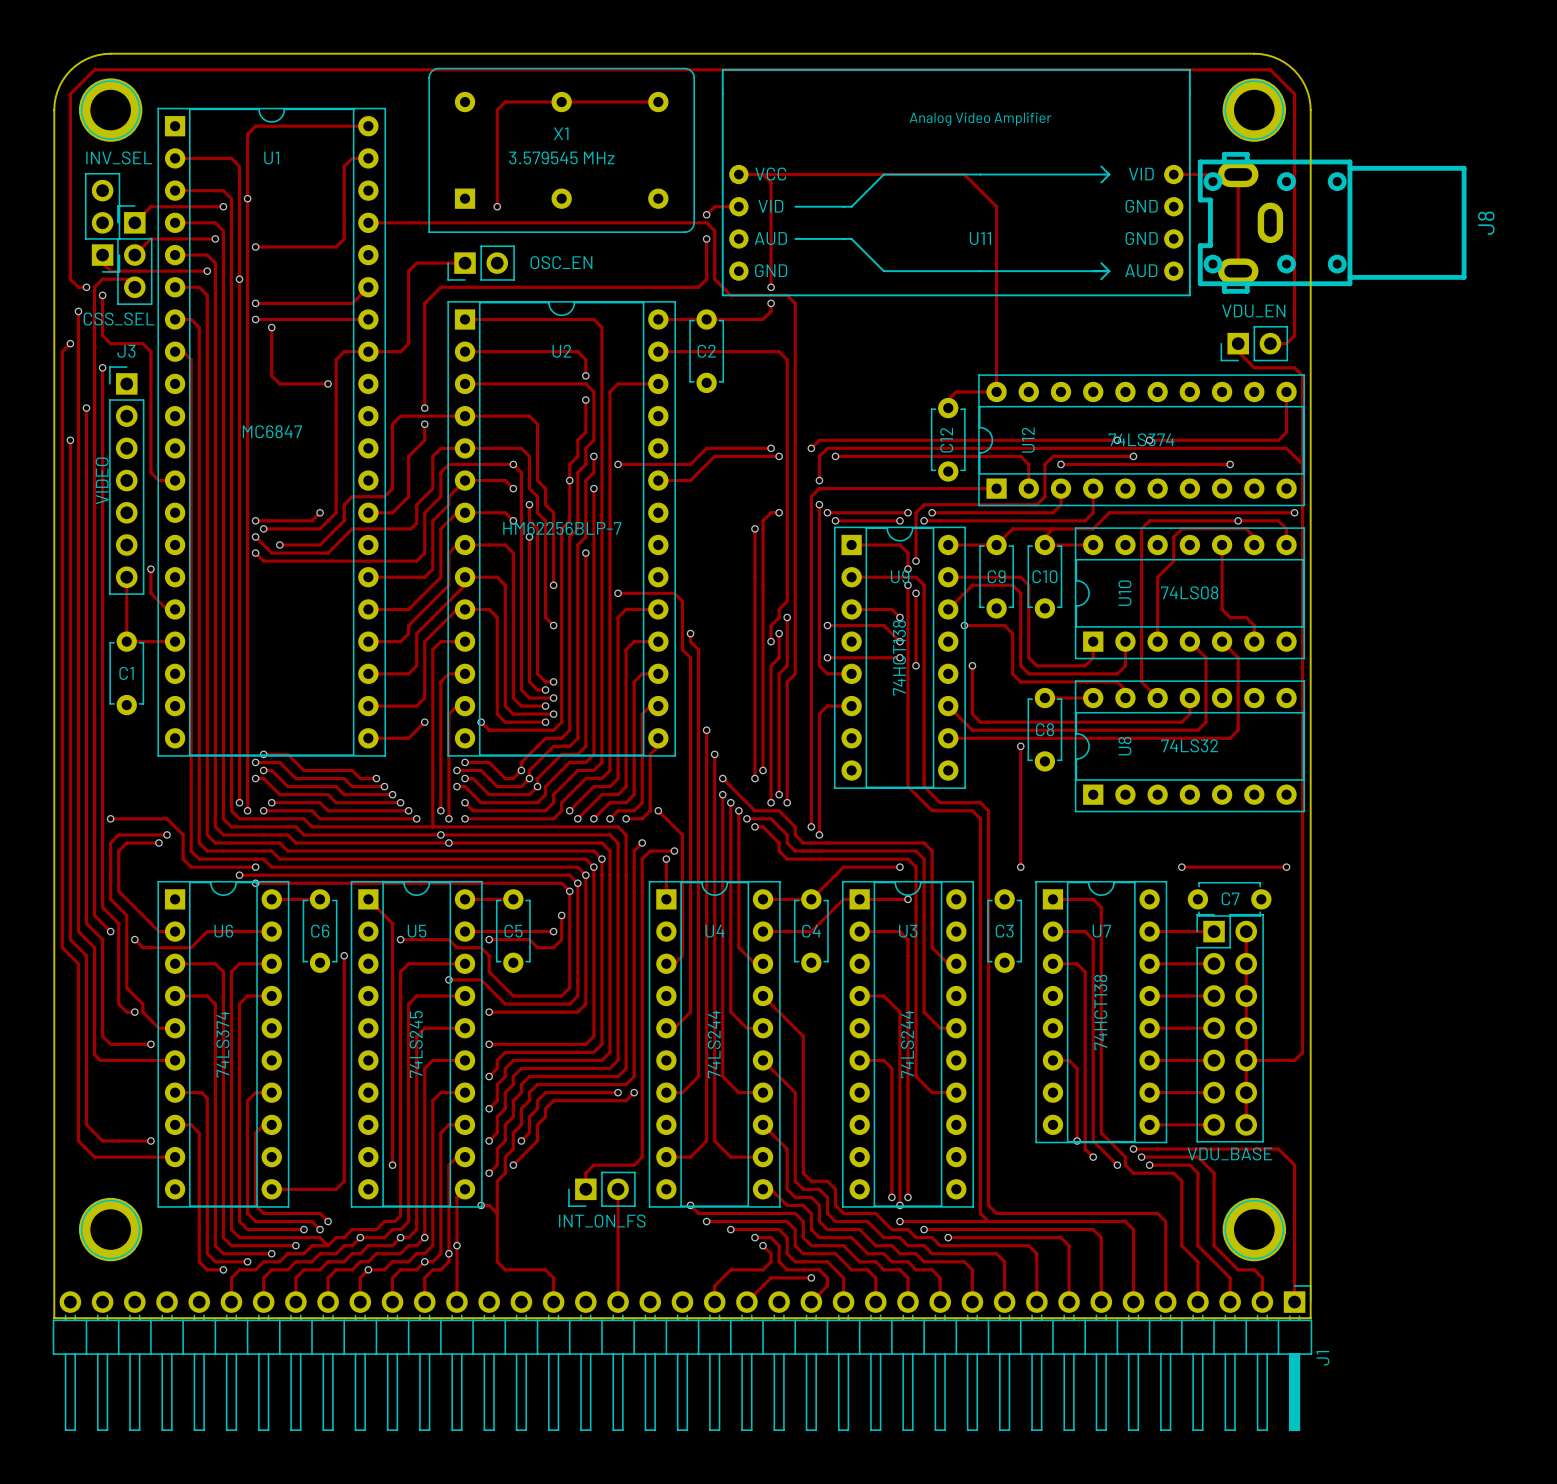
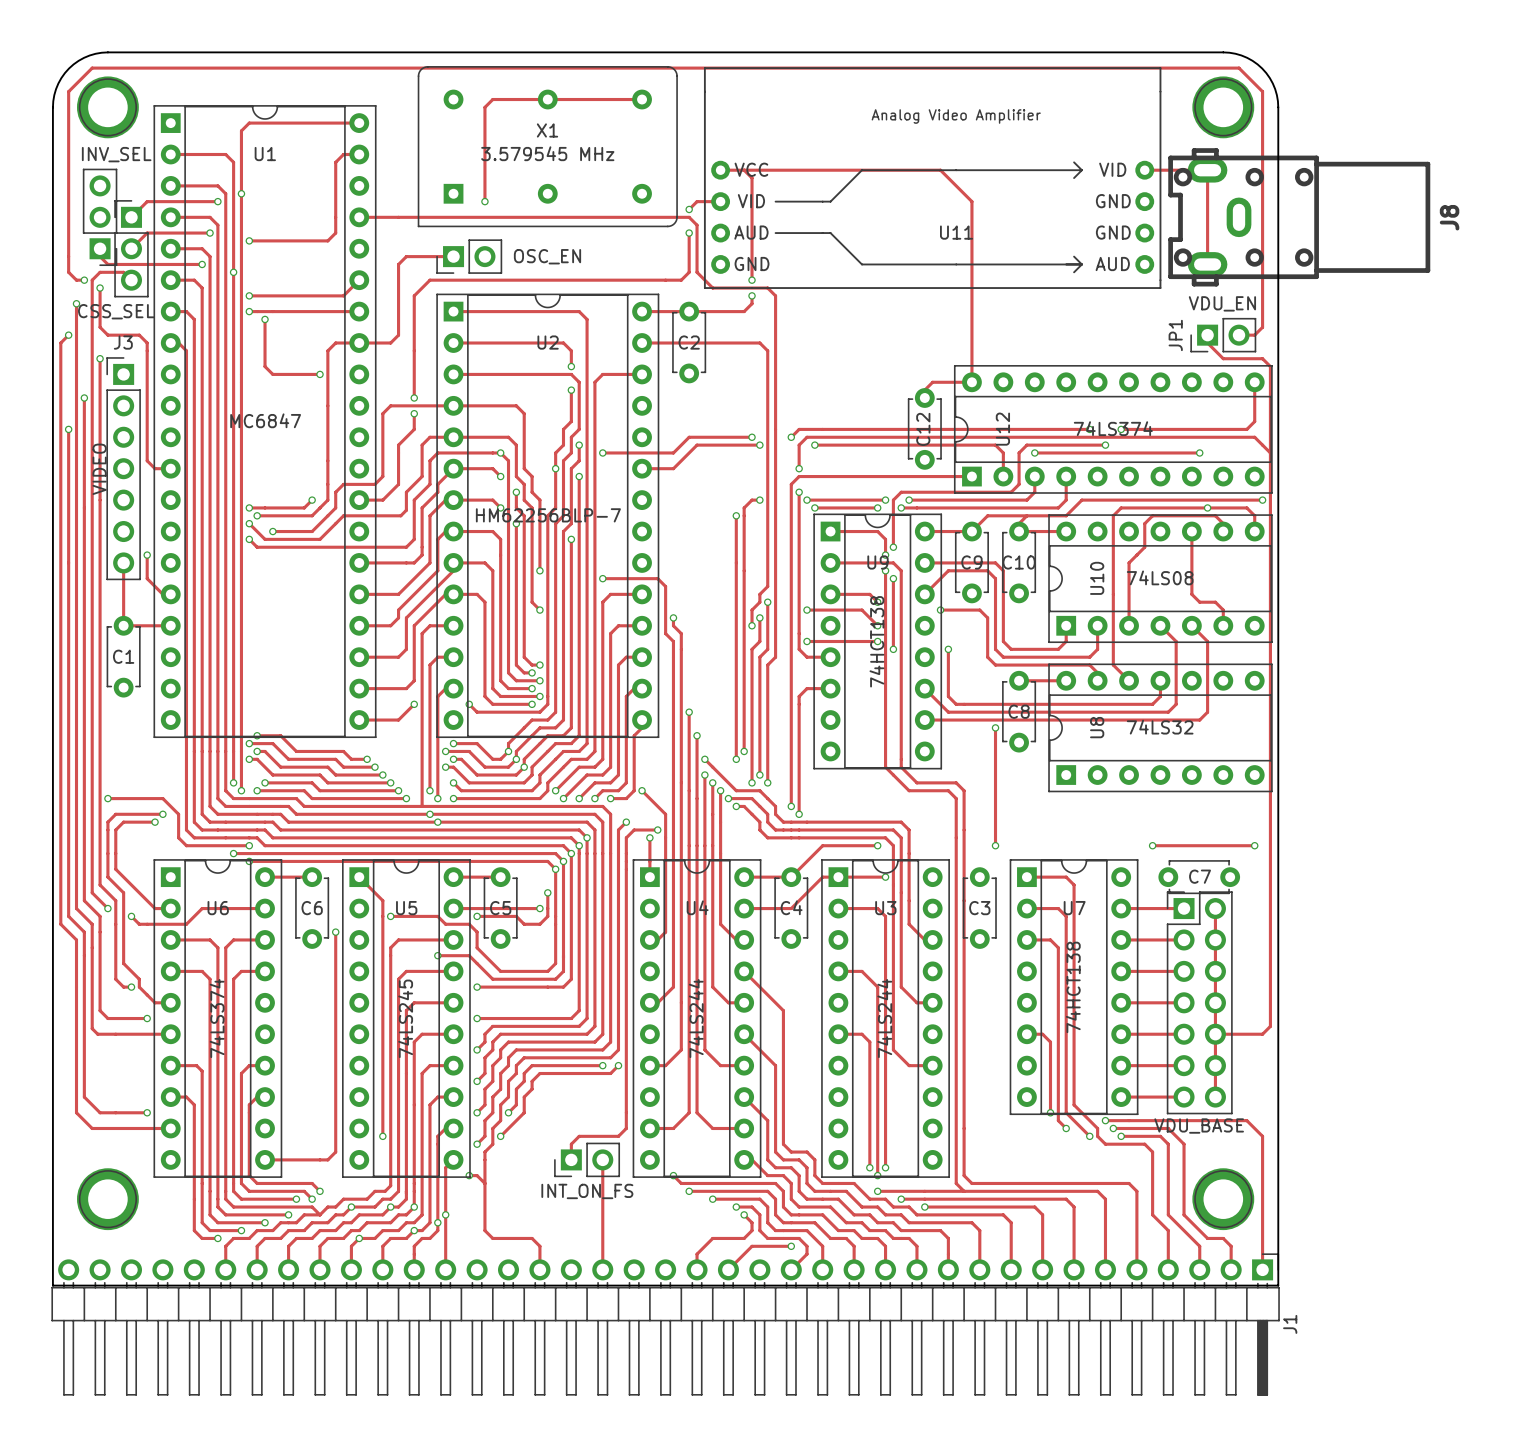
JP1 name: none -> JP1 (1175, 335)

